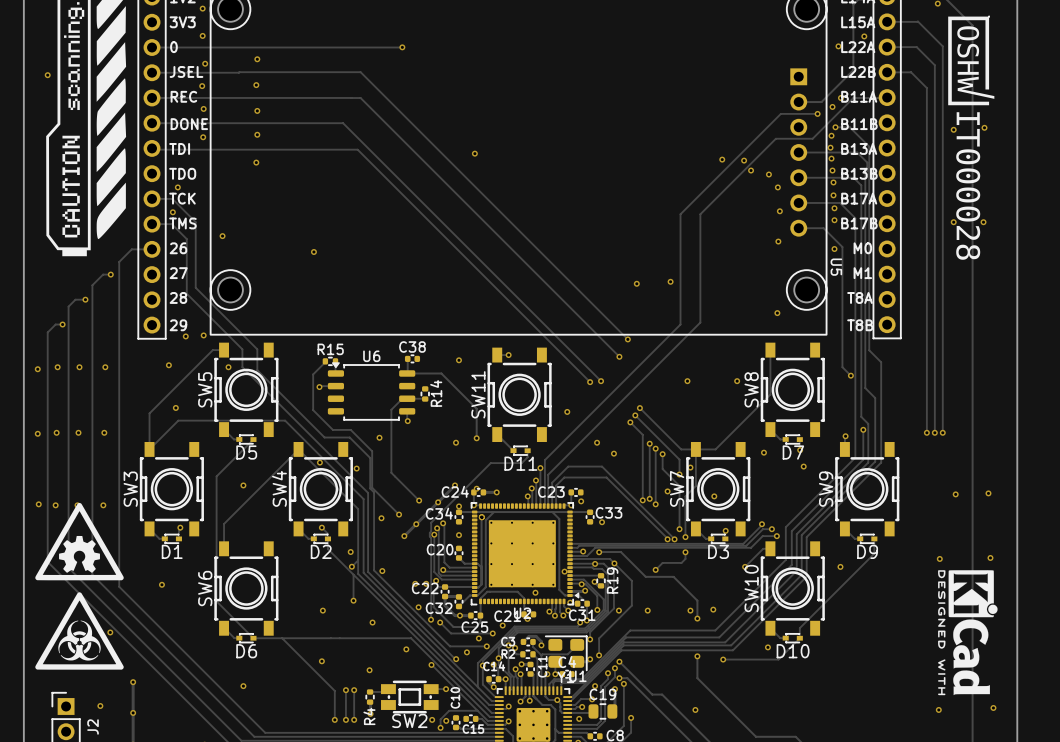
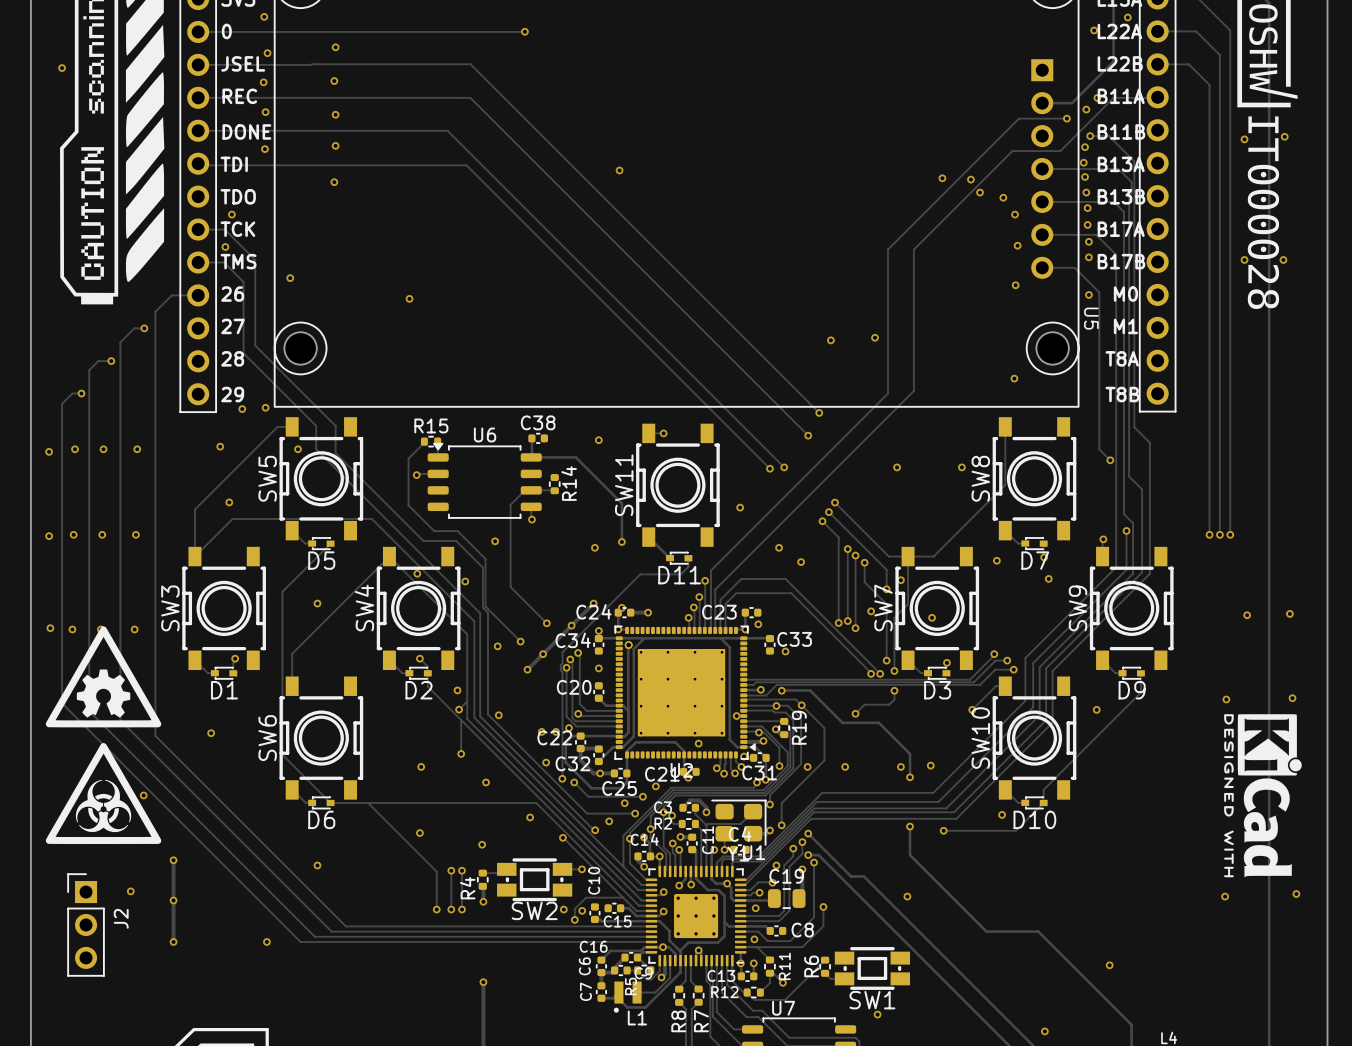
R4 name position: R4 (369, 716) -> R4 (467, 888)

